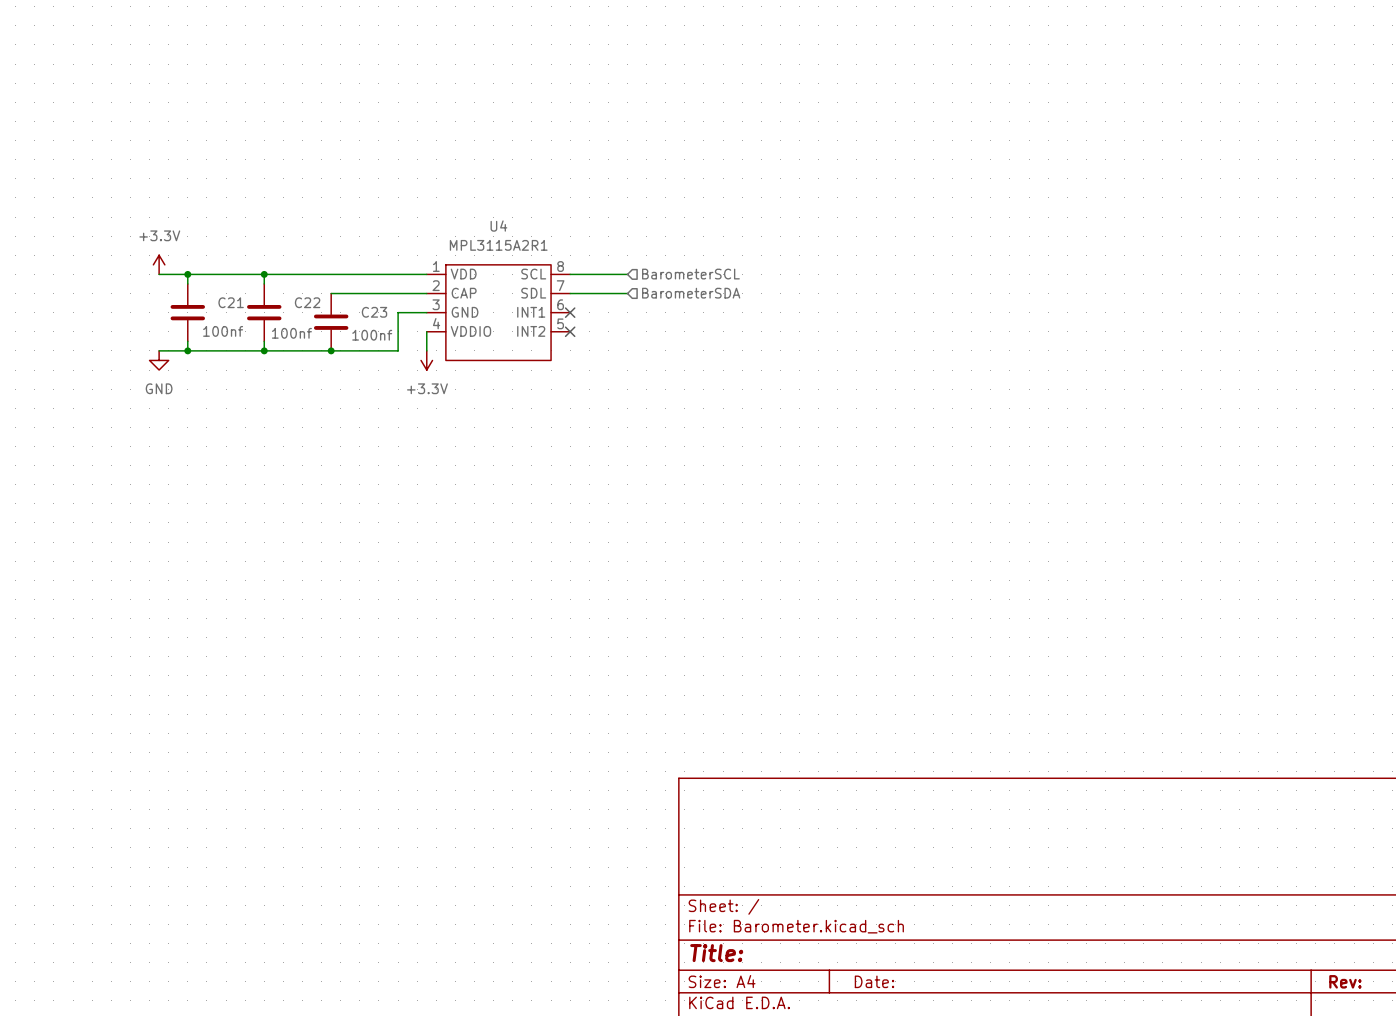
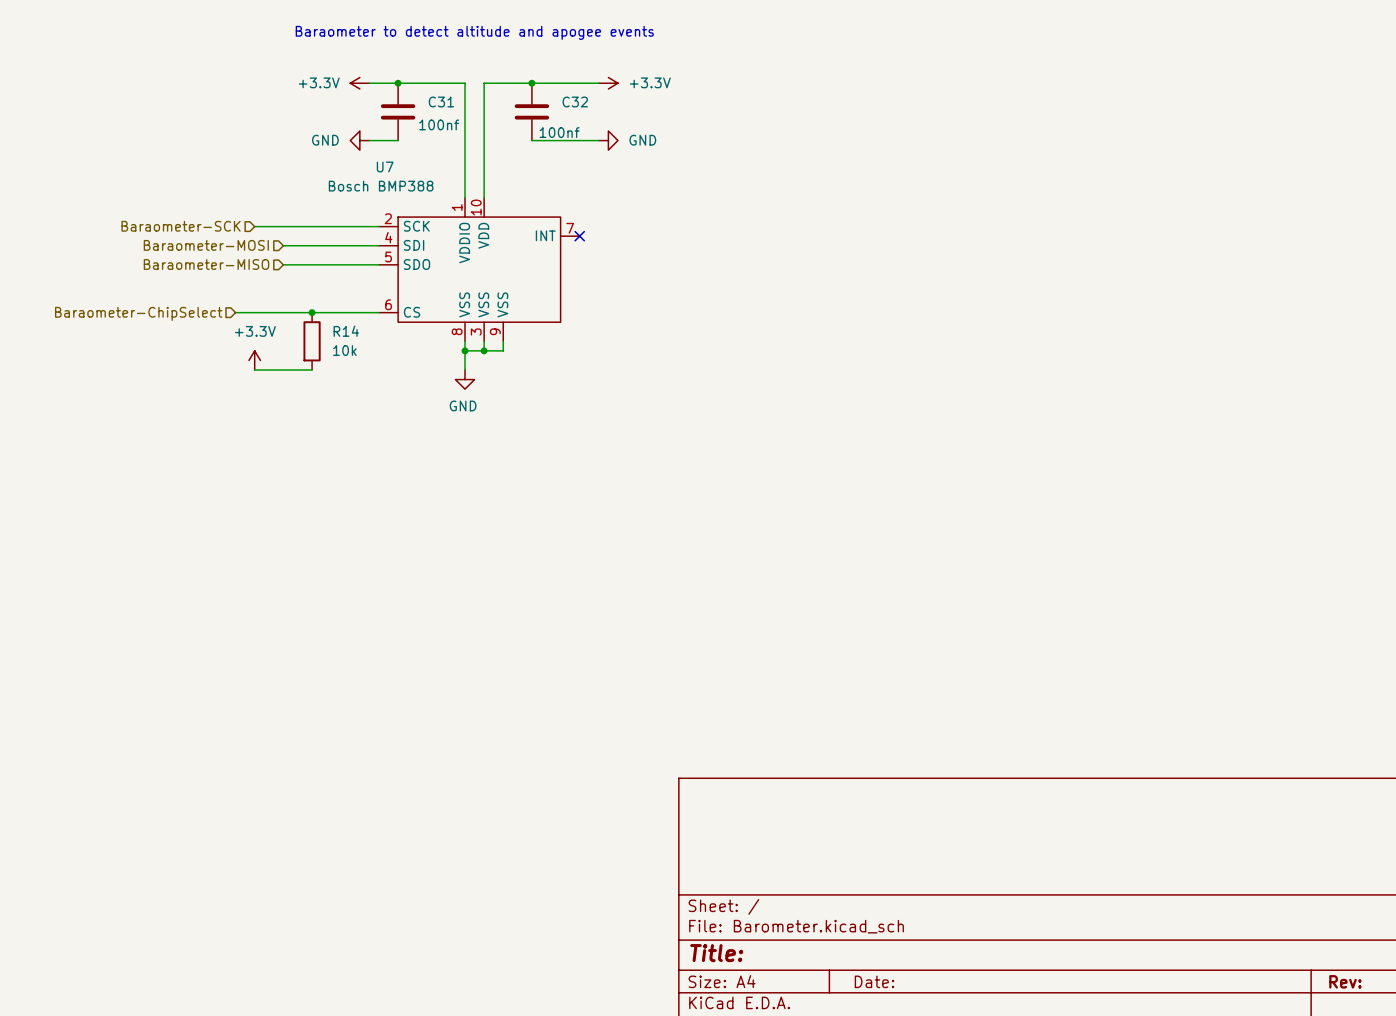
text: none -> Baraometer to detect altitude and apogee events (474, 32)
power symbol: none -> +3.3V (359, 83)
wire: none -> (369, 83) (465, 83) (465, 197)
junction: none -> (398, 83)
junction: none -> (531, 83)
wire: none -> (598, 83) (484, 83) (484, 197)
power symbol: none -> +3.3V (608, 83)
C31: none -> 100nf (398, 111)
C32: none -> 100nf (531, 111)
power symbol: none -> GND (359, 140)
wire: none -> (369, 140) (398, 140)
wire: none -> (531, 140) (598, 140)
power symbol: none -> GND (608, 140)
hierarchical label: none -> Baraometer-SCK (181, 226)
wire: none -> (254, 226) (378, 226)
no-connect mark: none -> (579, 236)
hierarchical label: none -> Baraometer-MOSI (206, 245)
wire: none -> (283, 245) (378, 245)
power symbol: +3.3V (159, 264) -> none
hierarchical label: none -> Baraometer-MISO (206, 264)
U7: none -> Bosch BMP388 (479, 269)
wire: (159, 274) (426, 274) -> none
wire: (187, 274) (187, 283) -> none
junction: (187, 274) -> none
wire: (264, 274) (264, 283) -> none
junction: (264, 274) -> none
wire: (570, 274) (627, 274) -> none
hierarchical label: BarometerSCL (690, 274) -> none
wire: (331, 293) (426, 293) -> (283, 264) (378, 264)
wire: (570, 293) (627, 293) -> none
hierarchical label: BarometerSDA (691, 293) -> none
C21: 100nf (187, 312) -> none
wire: none -> (235, 312) (378, 312)
C22: 100nf (264, 312) -> none
junction: none -> (312, 312)
wire: (426, 312) (398, 312) (398, 350) (159, 350) -> none
U4: MPL3115A2R1 (498, 312) -> none
no-connect mark: (570, 312) -> none
hierarchical label: none -> Baraometer-ChipSelect (138, 313)
C23: 100nf (331, 322) -> none
wire: (426, 331) (426, 350) -> none
no-connect mark: (570, 331) -> none
wire: (187, 341) (187, 350) -> none
wire: (264, 341) (264, 350) -> none
R14: none -> 10k (312, 341)
wire: none -> (465, 341) (465, 370)
wire: none -> (484, 341) (484, 350)
wire: none -> (503, 341) (503, 350) (465, 350)
junction: (187, 350) -> none
junction: (264, 350) -> none
junction: (331, 350) -> none
junction: none -> (465, 350)
junction: none -> (484, 350)
power symbol: GND (159, 360) -> none
power symbol: none -> +3.3V (254, 360)
power symbol: +3.3V (426, 360) -> none
wire: none -> (254, 370) (312, 370)
power symbol: none -> GND (465, 379)

